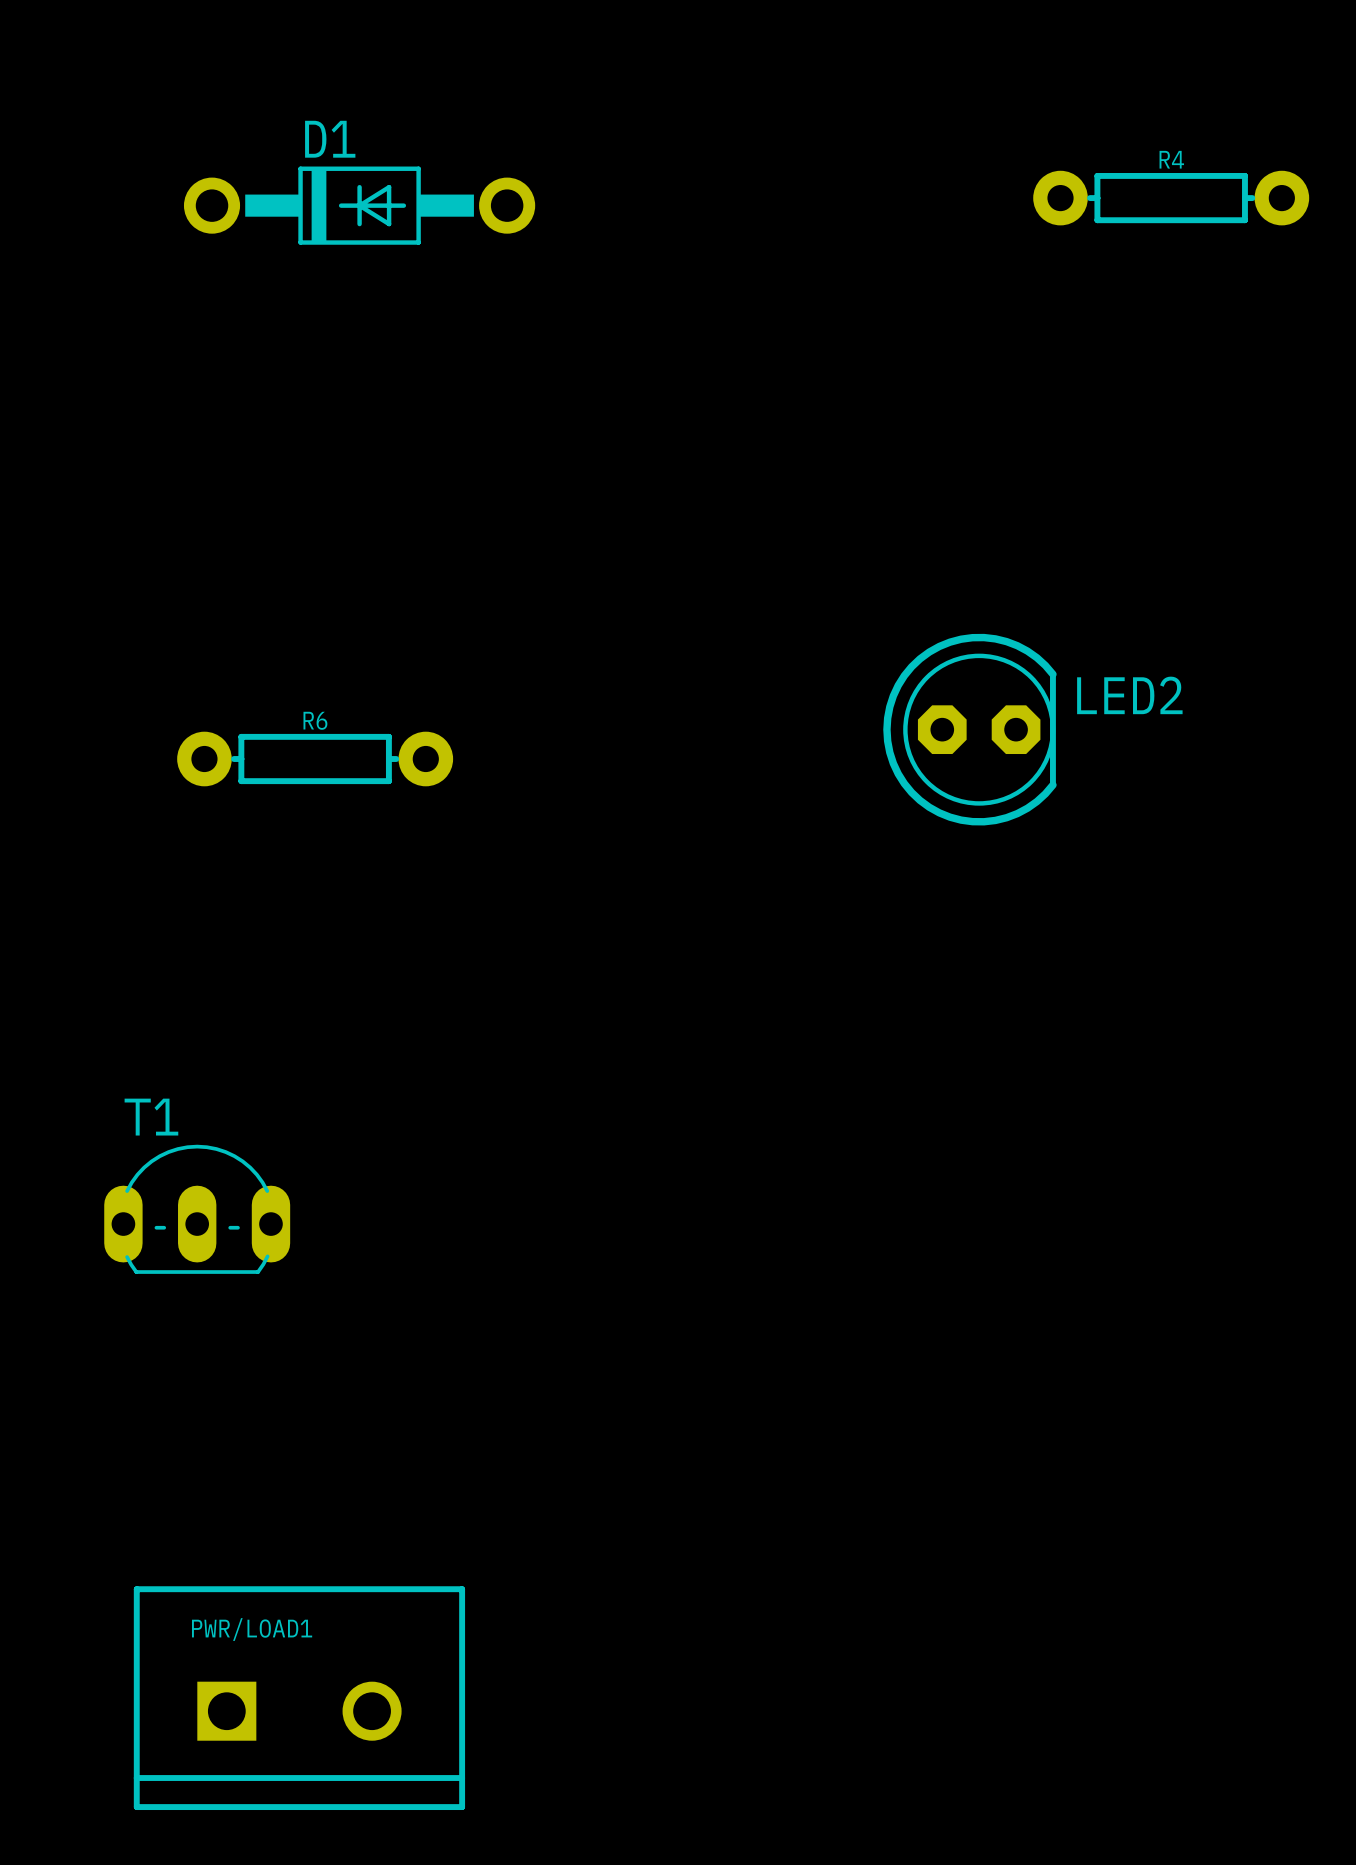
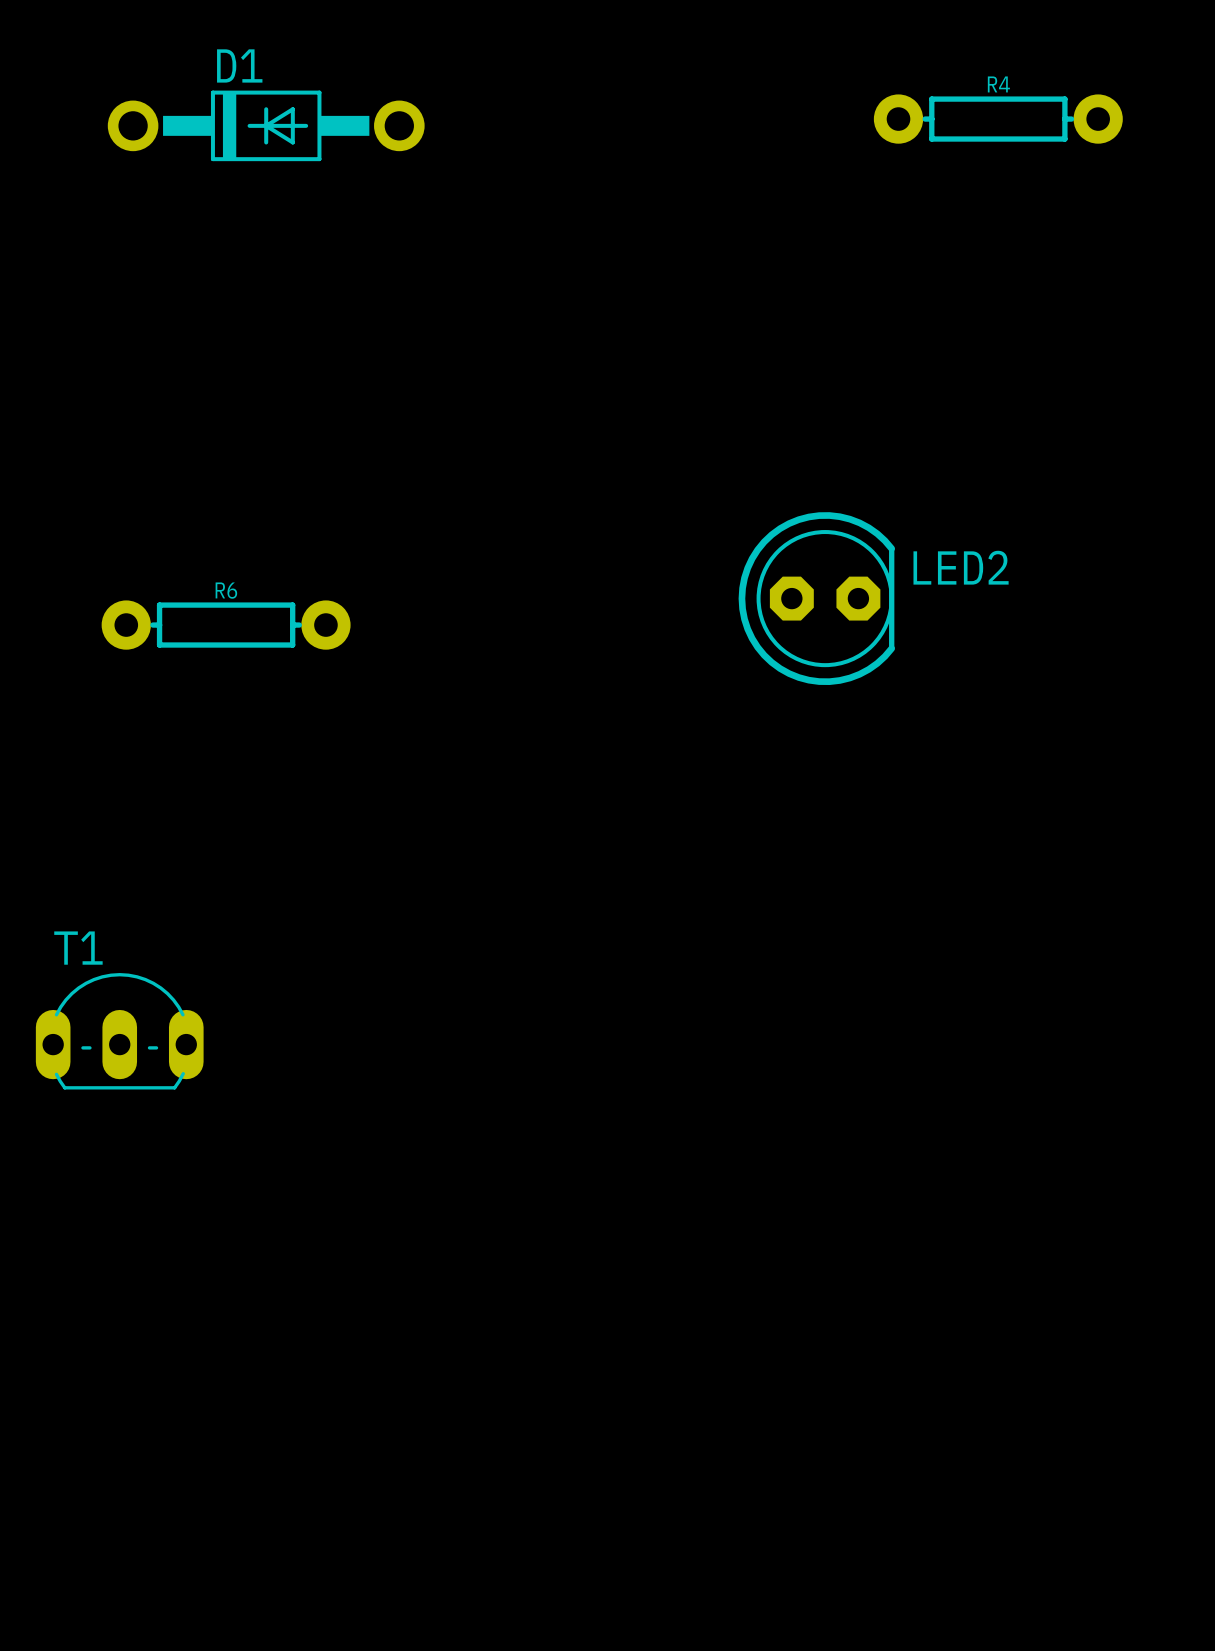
PWR/LOAD1: (299, 1698) -> none

